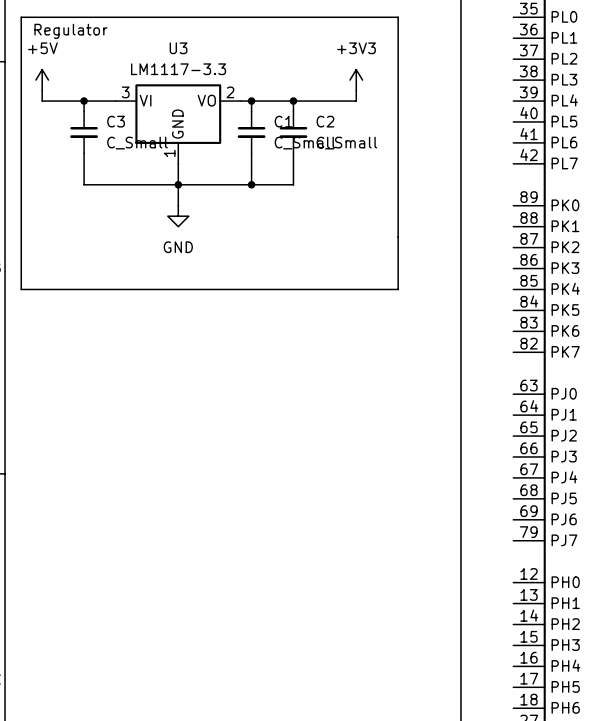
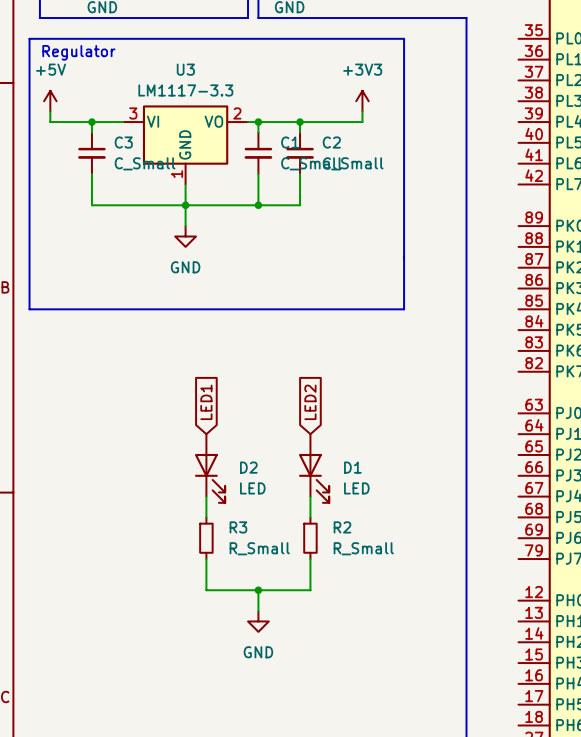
global label: none -> LED1 (206, 402)
global label: none -> LED2 (310, 402)
D2: none -> LED (210, 468)
D1: none -> LED (314, 468)
wire: none -> (206, 496) (206, 517)
wire: none -> (310, 496) (310, 517)
R3: none -> R_Small (206, 538)
R2: none -> R_Small (310, 538)
wire: none -> (206, 559) (206, 590) (310, 590) (310, 559)
wire: none -> (258, 590) (258, 611)
junction: none -> (258, 590)
power symbol: none -> GND (258, 621)

